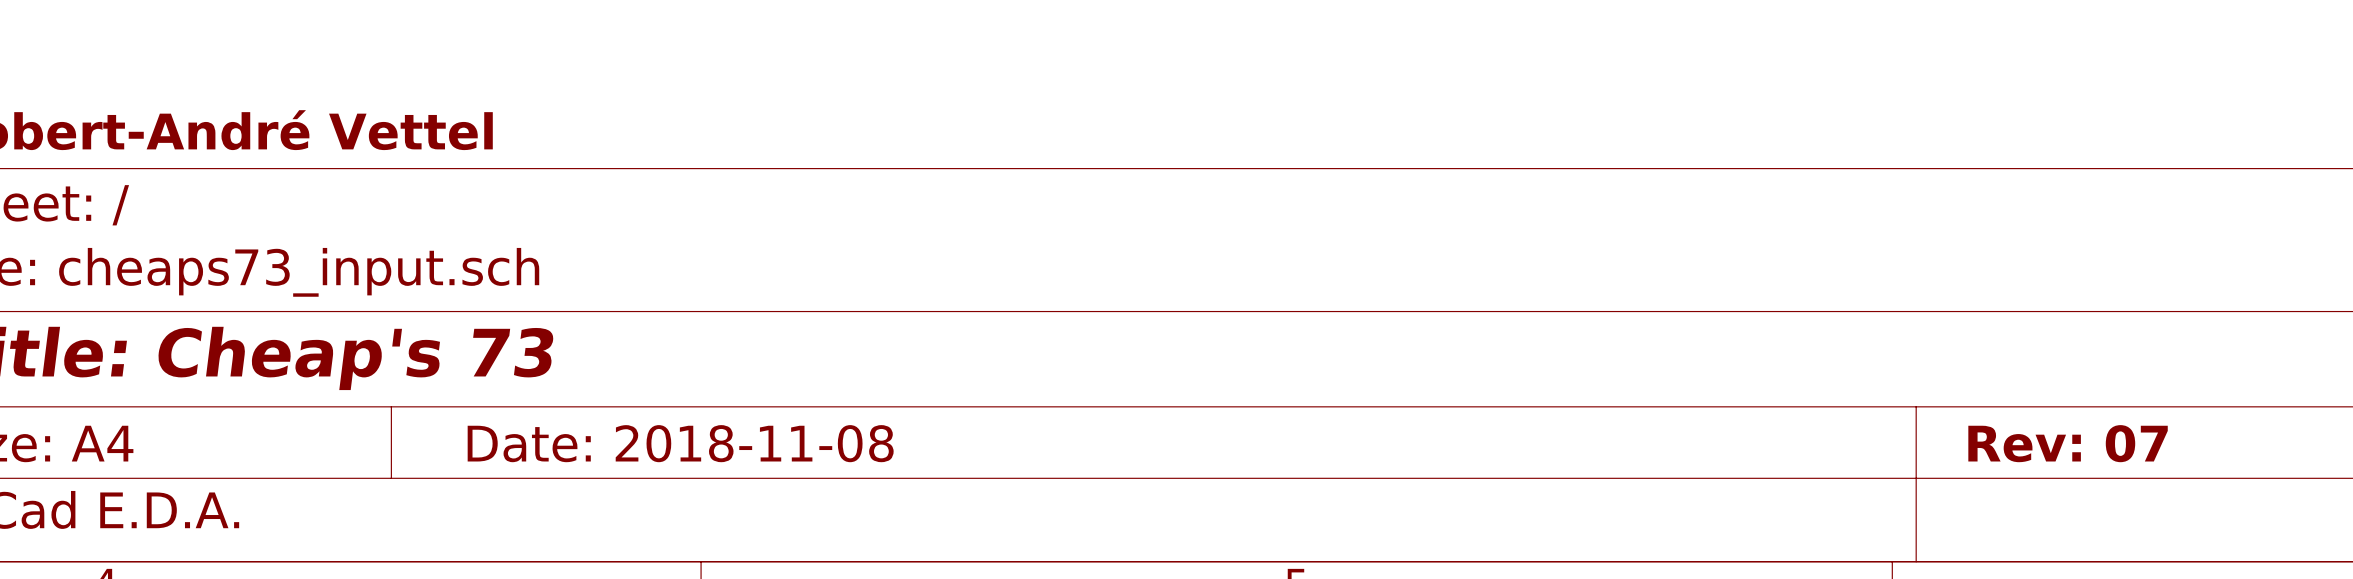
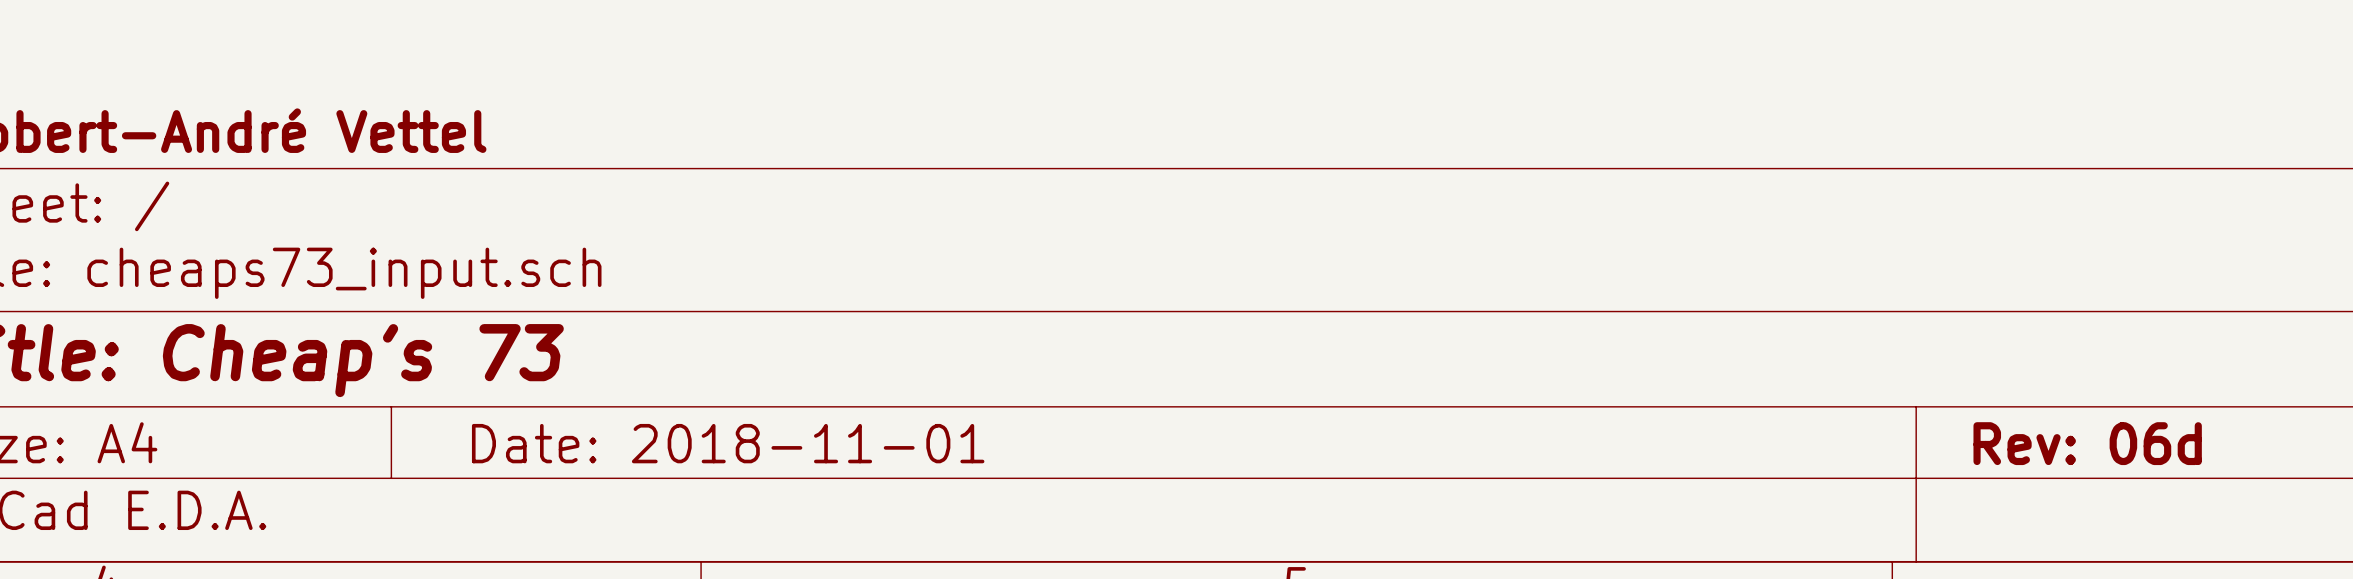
title block: Date: 2018-11-08 (680, 443) -> Date: 2018-11-01 (728, 443)
title block: Rev: 07 (2068, 443) -> Rev: 06d (2087, 443)

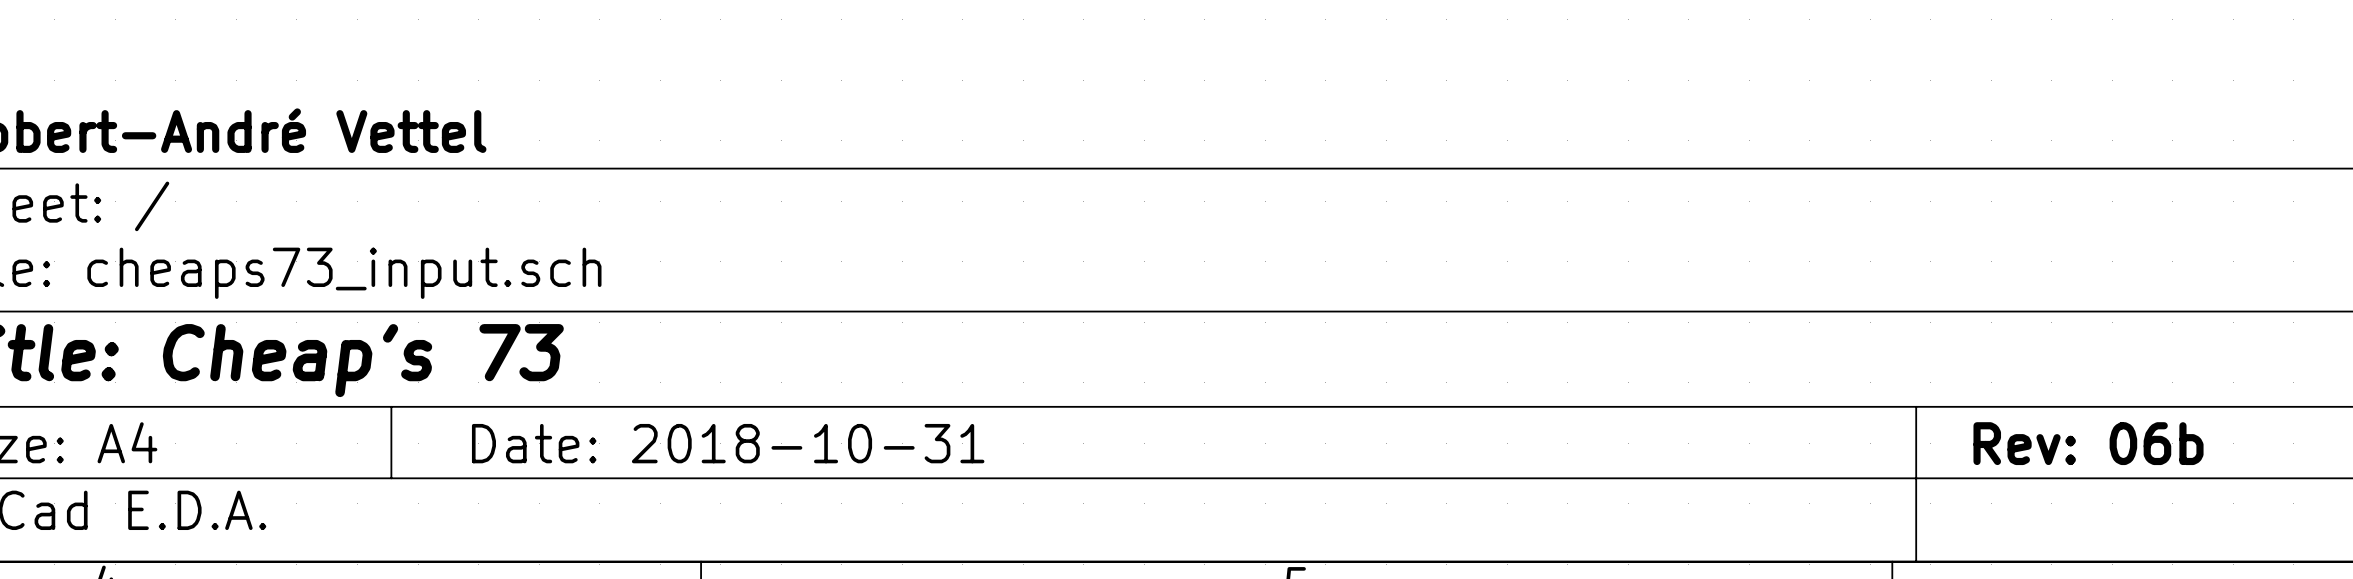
title block: Date: 2018-11-01 (728, 443) -> Date: 2018-10-31 (728, 443)
title block: Rev: 06d (2087, 443) -> Rev: 06b (2088, 443)

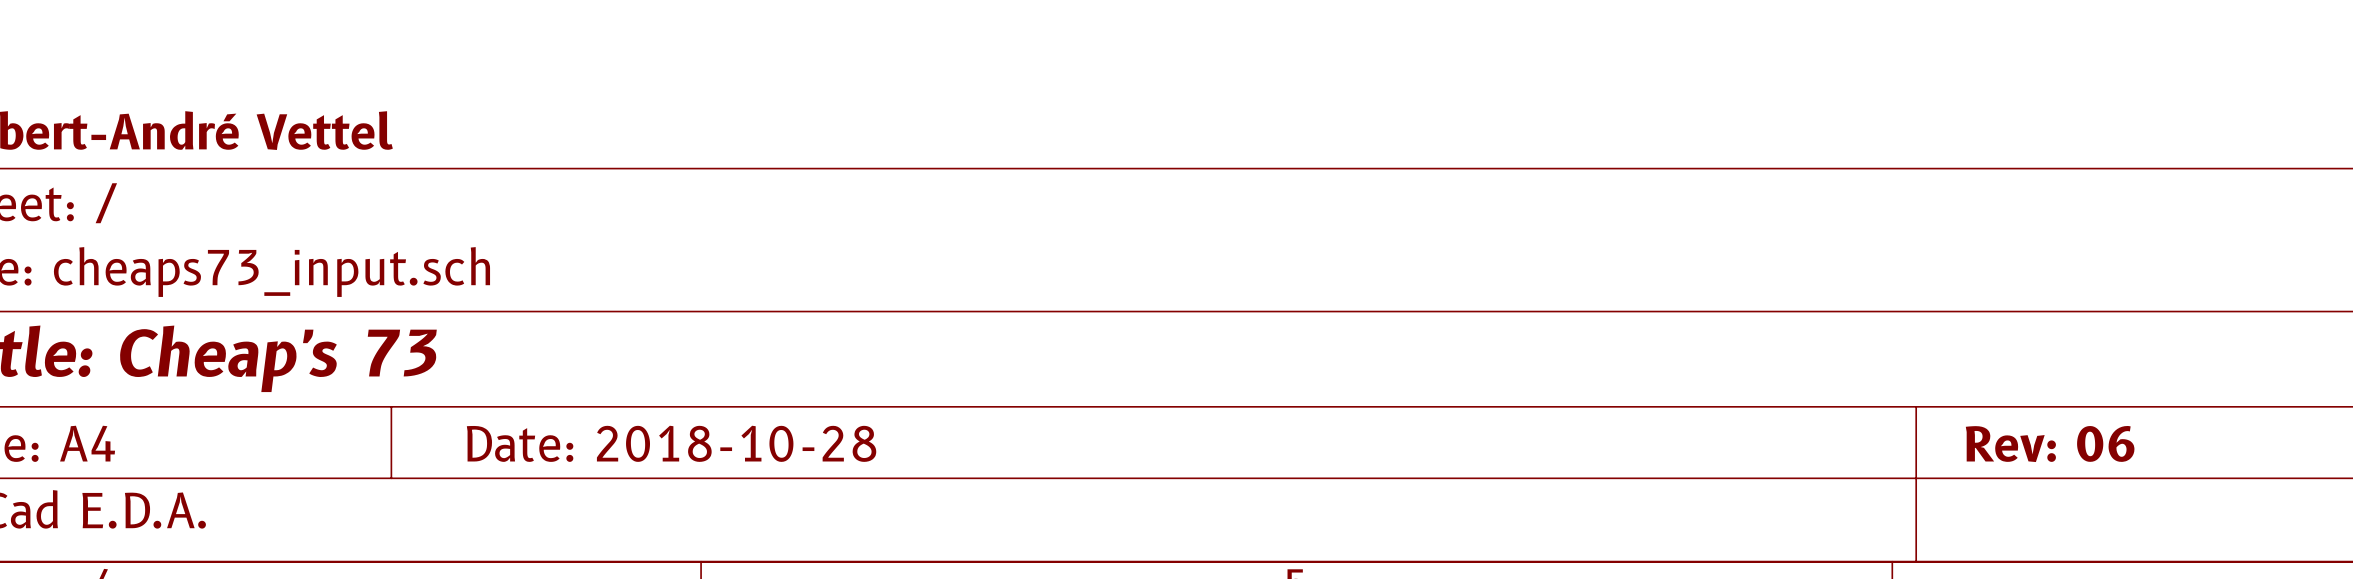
title block: Date: 2018-10-31 (728, 443) -> Date: 2018-10-28 (671, 443)
title block: Rev: 06b (2088, 443) -> Rev: 06 (2050, 444)

